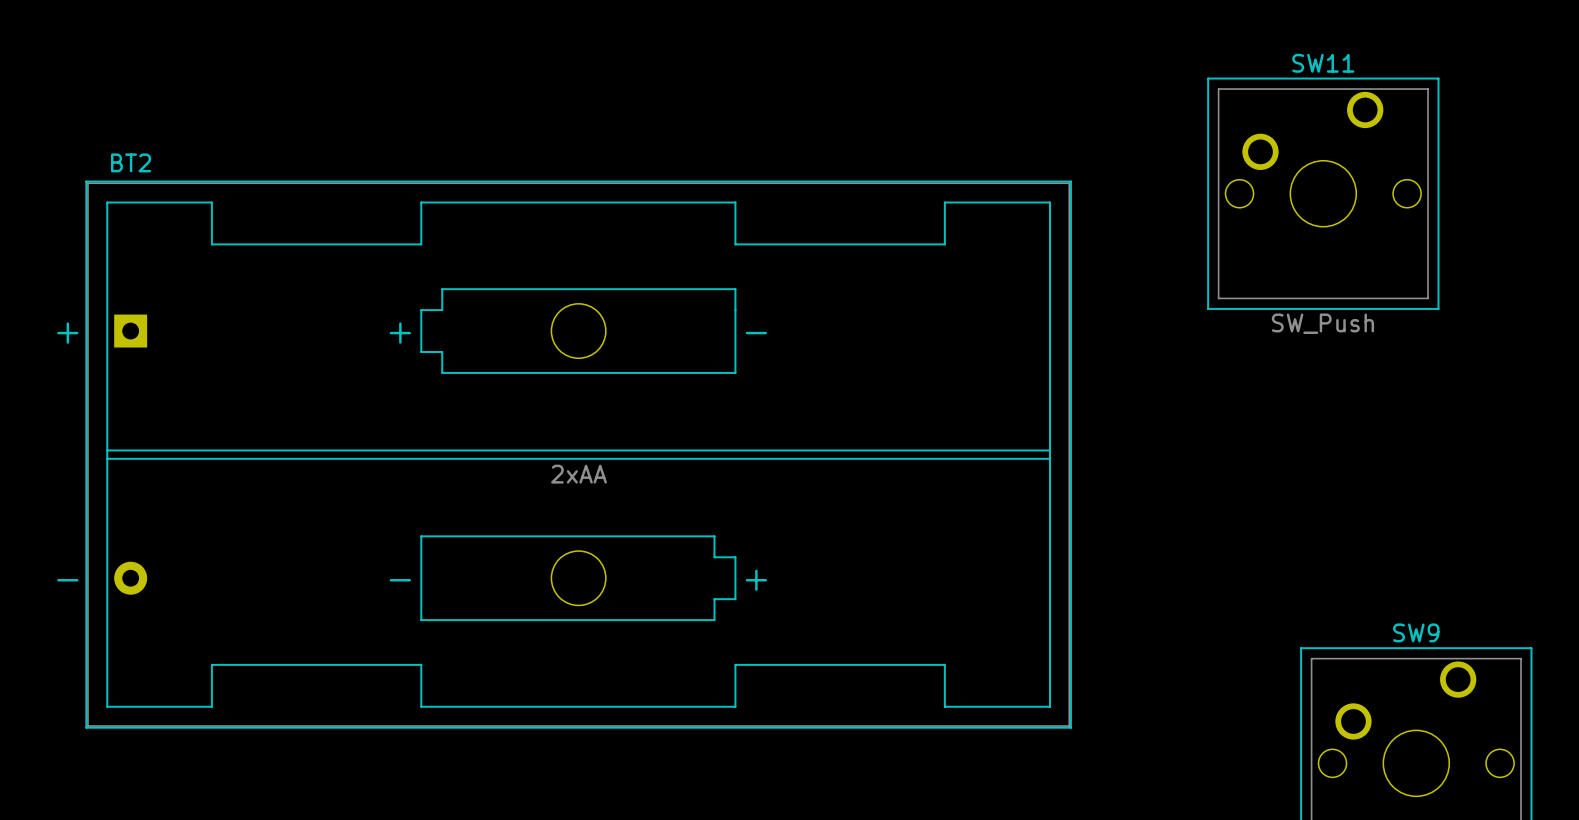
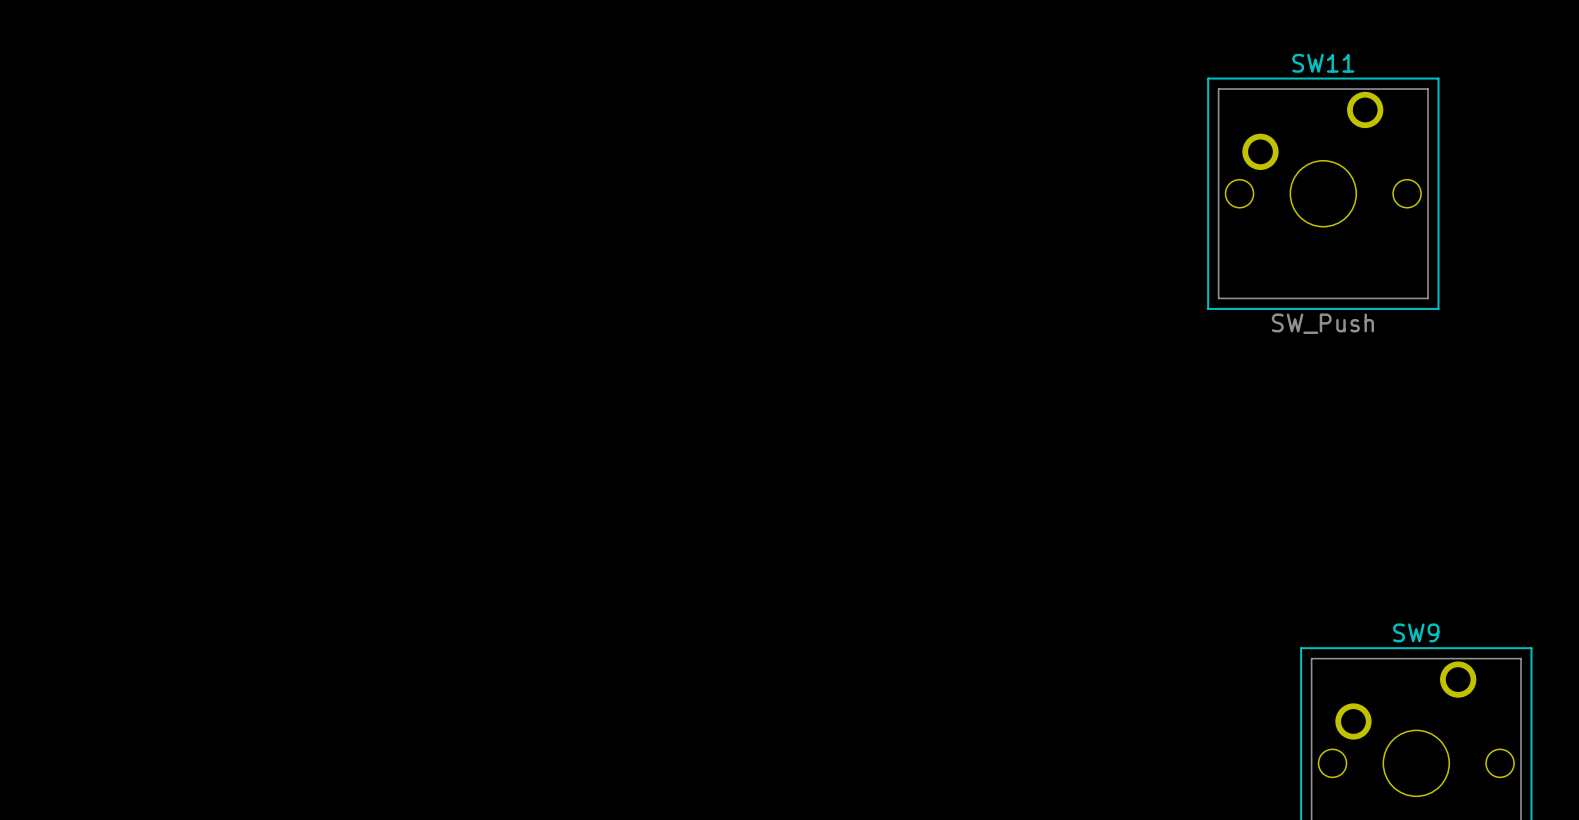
BT2: 2xAA (578, 454) -> none

